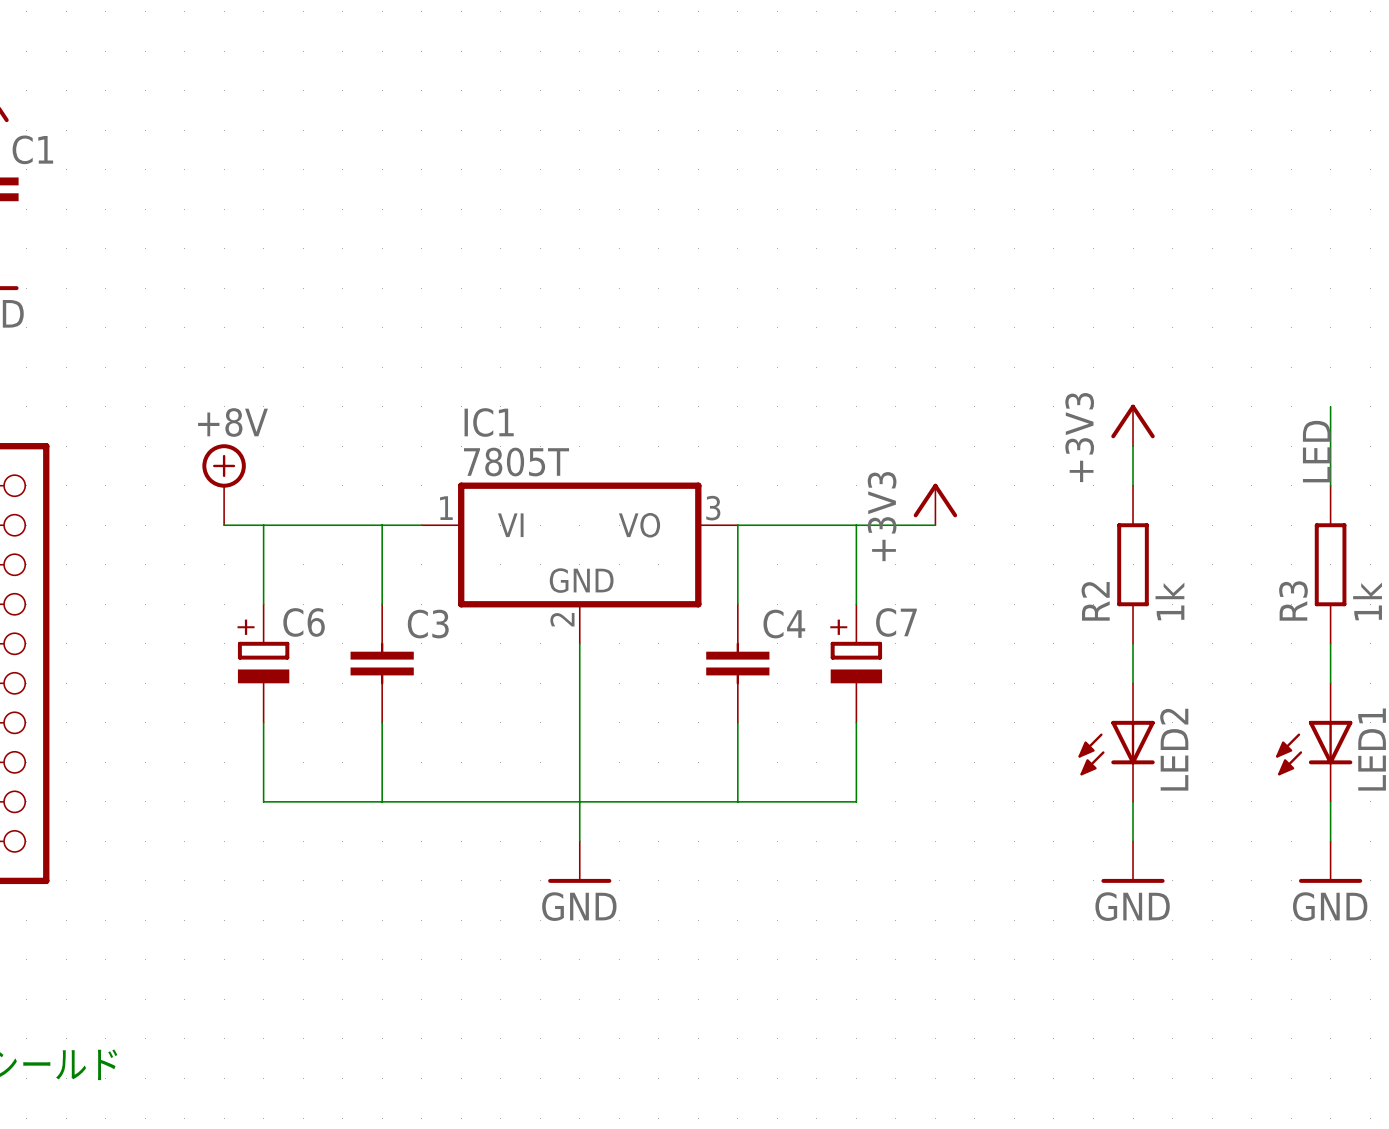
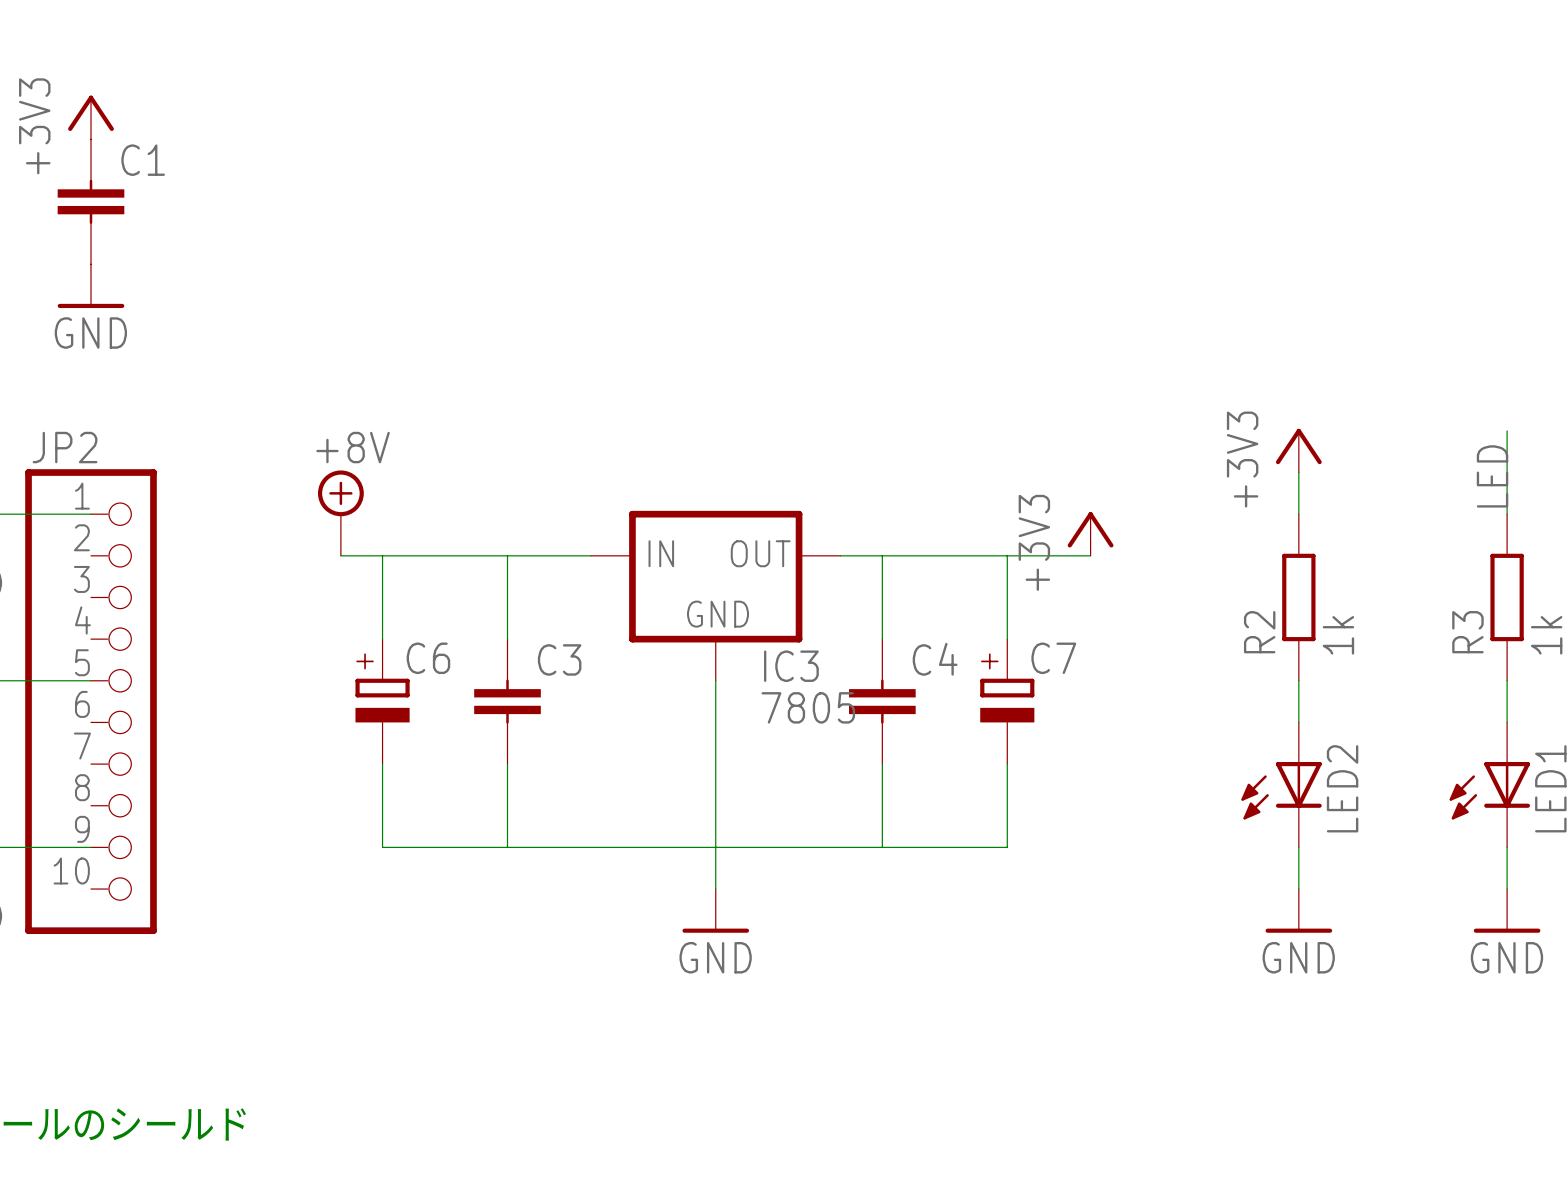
IC1: 7805T (579, 563) -> none
IC3: none -> 7805 (715, 595)

